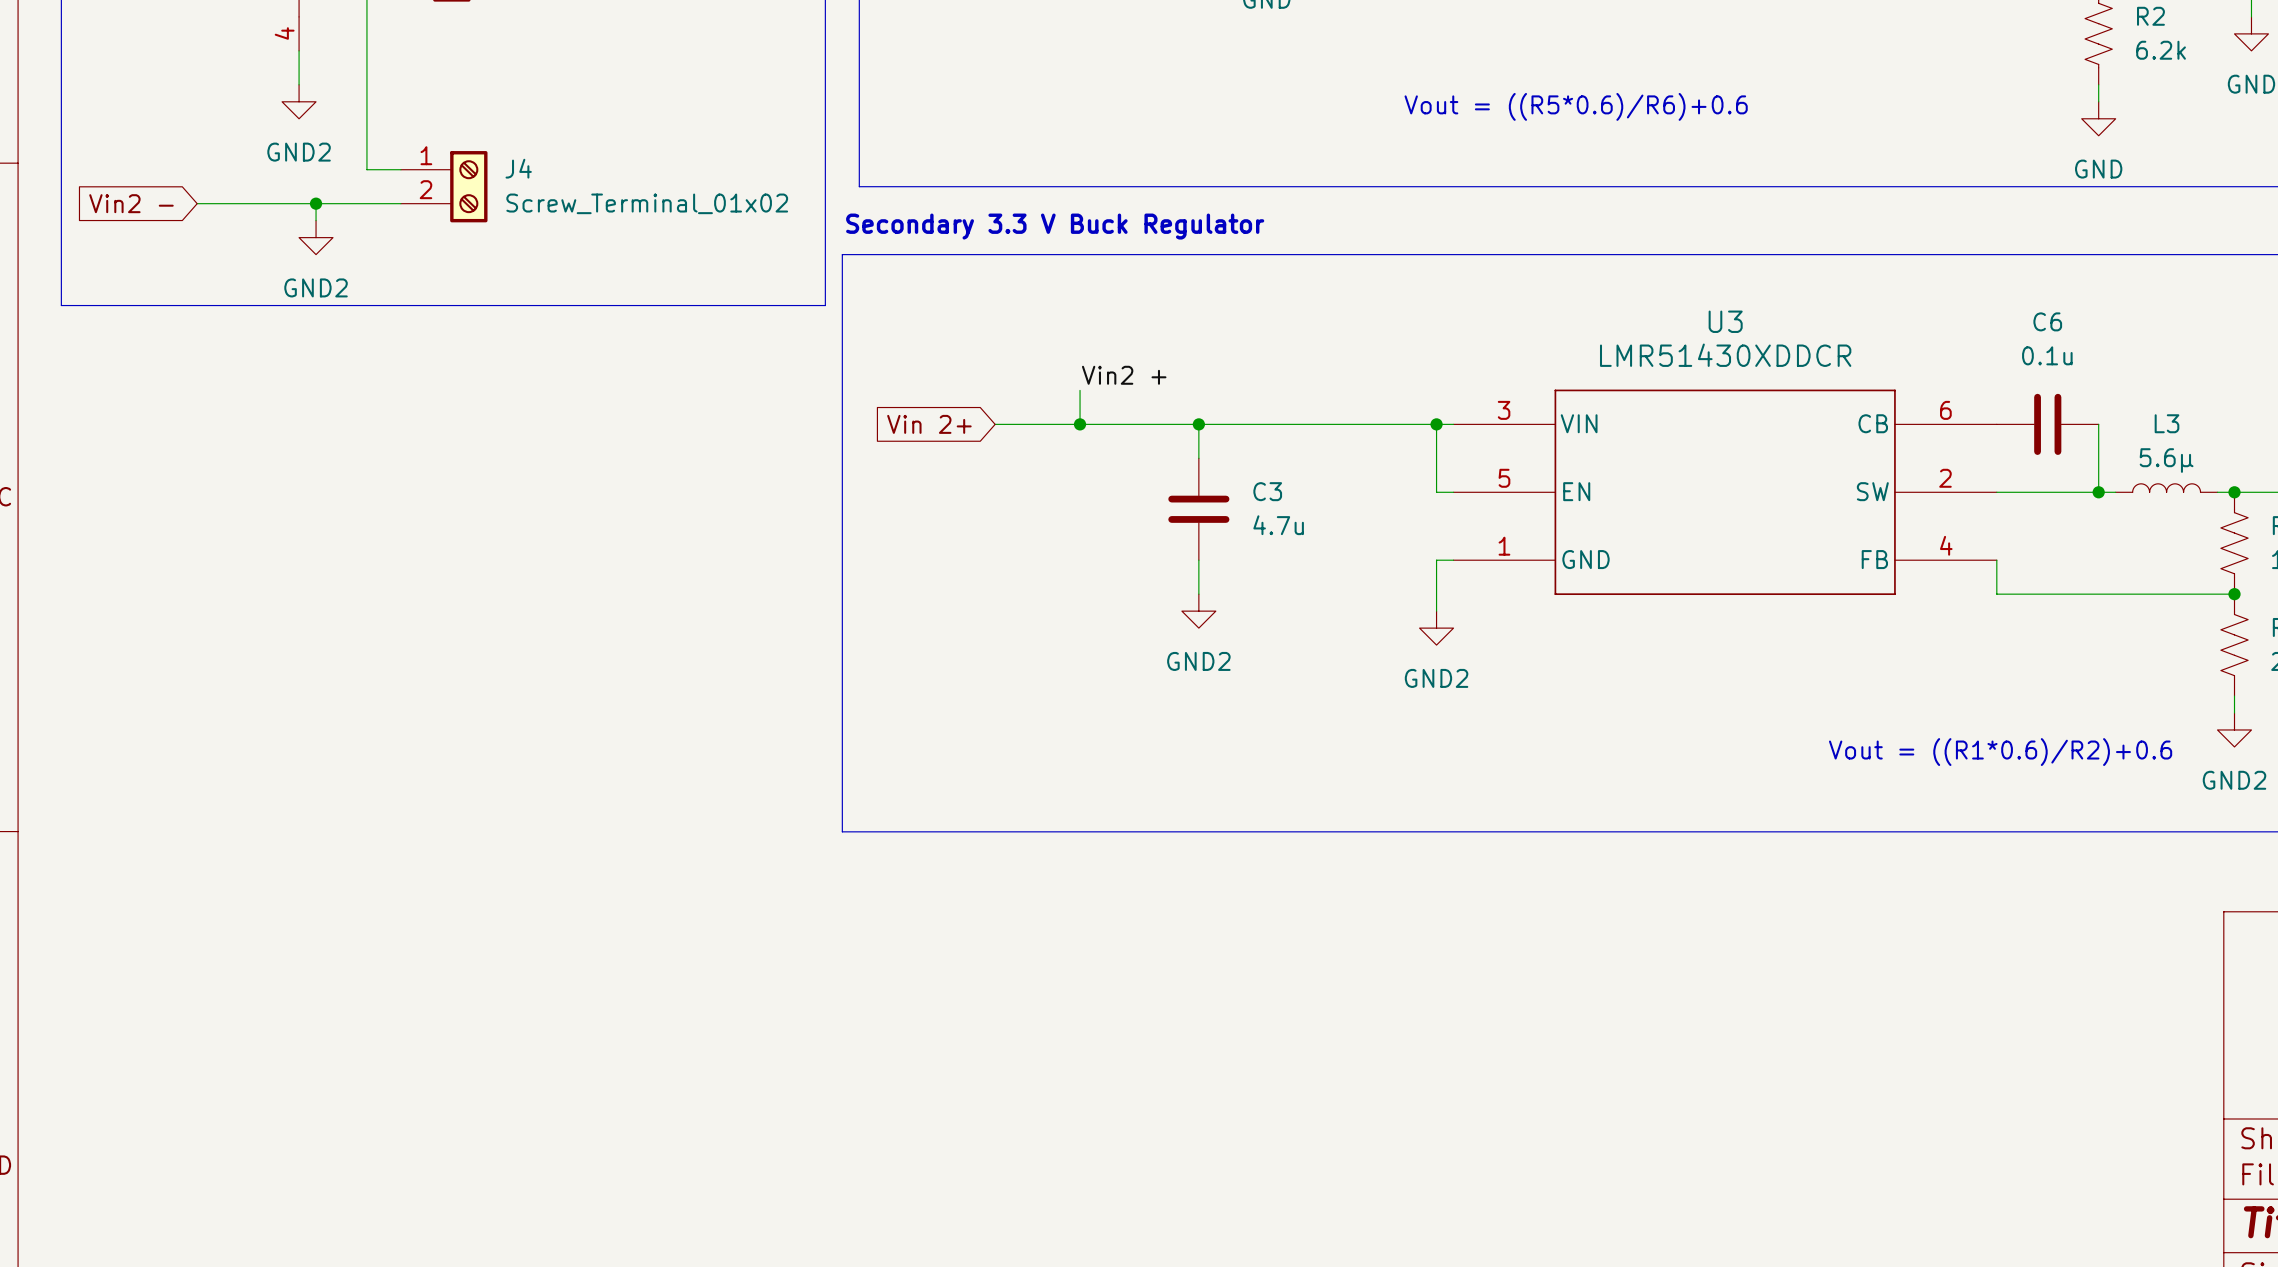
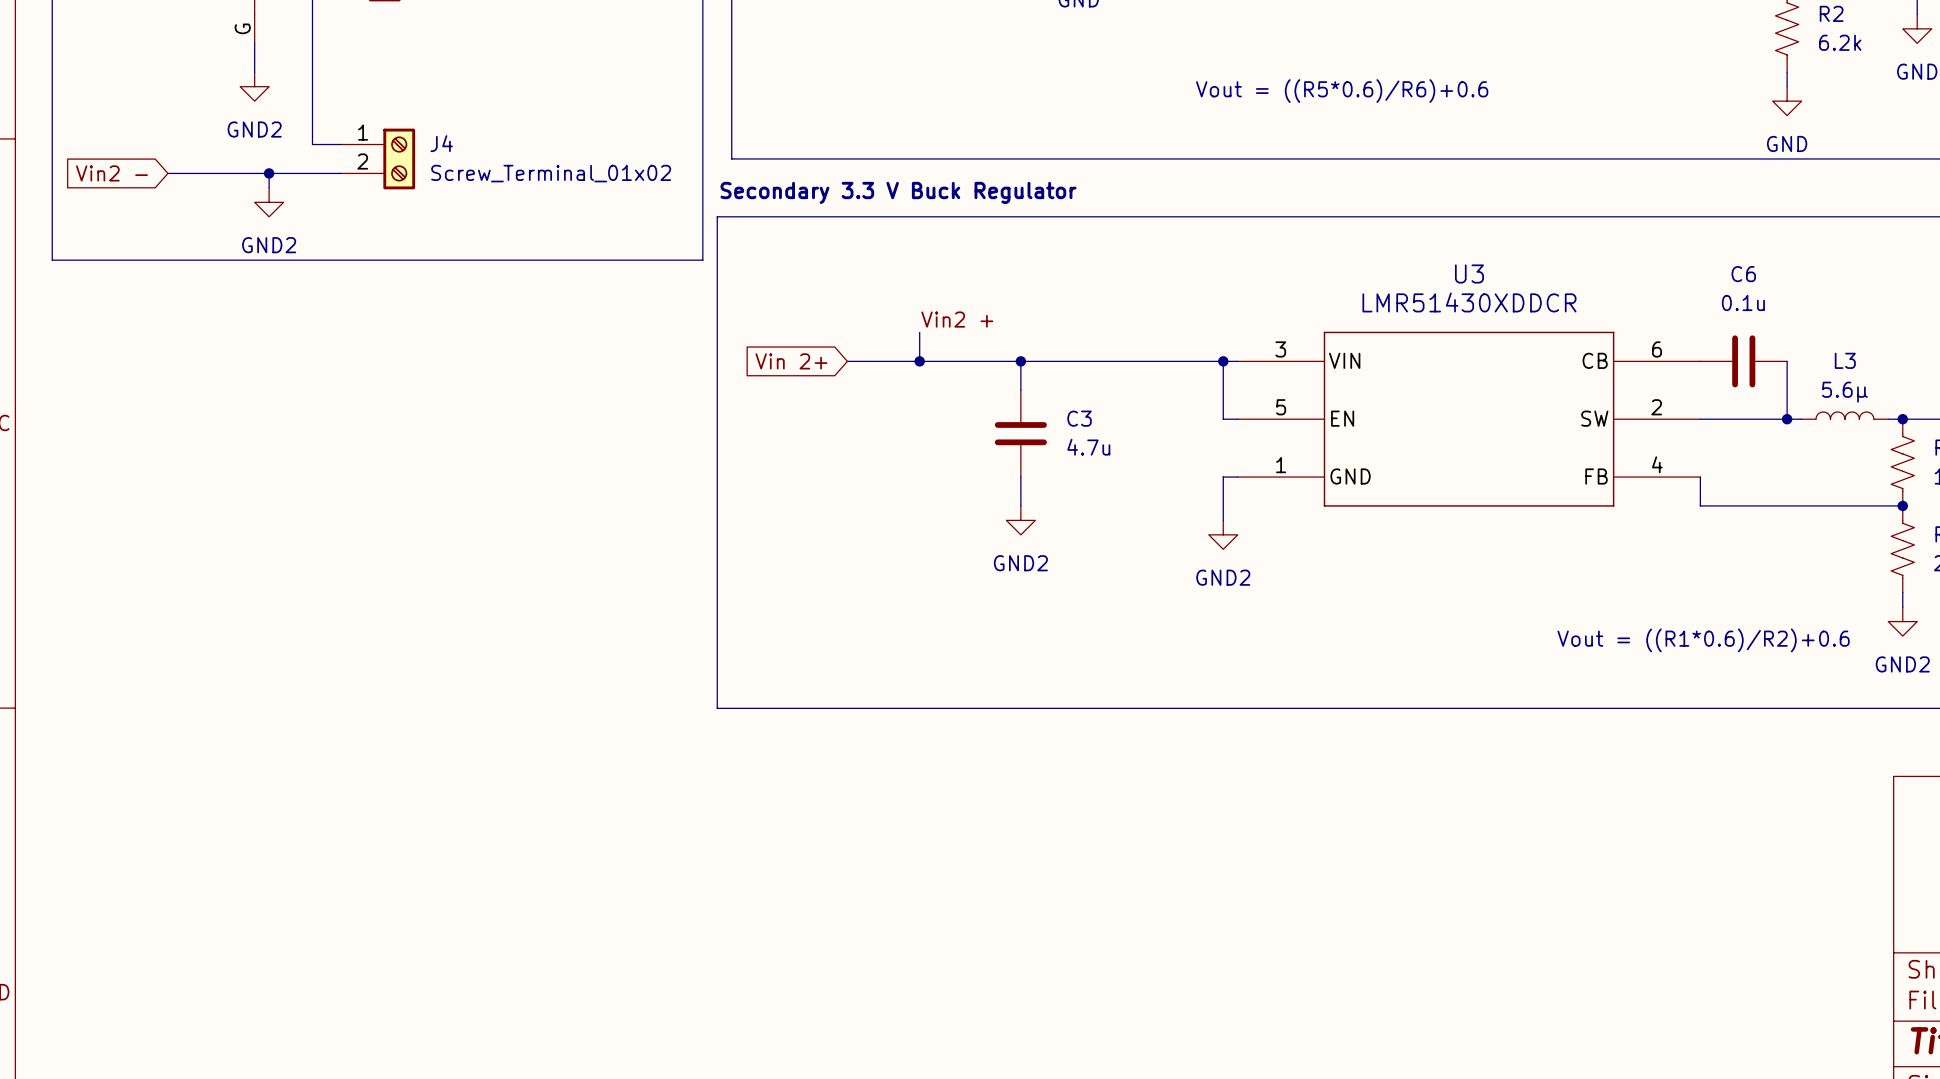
part pin number: 4 (284, 33) -> none
part pin name: none -> G (242, 28)

